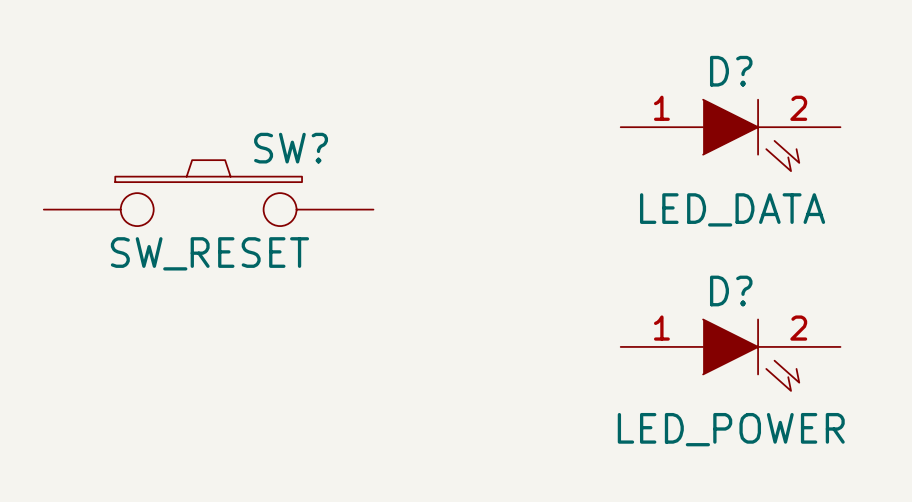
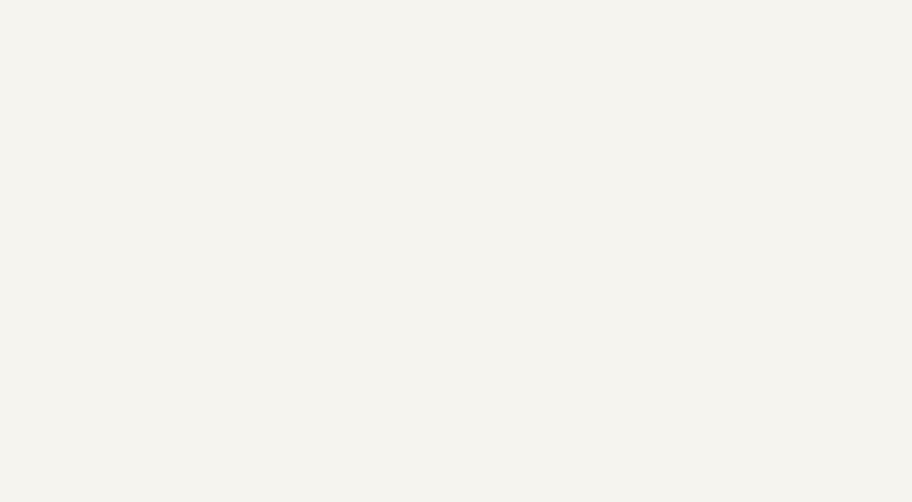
D?: LED_DATA (730, 135) -> none
SW?: SW_RESET (208, 193) -> none
D?: LED_POWER (730, 355) -> none

